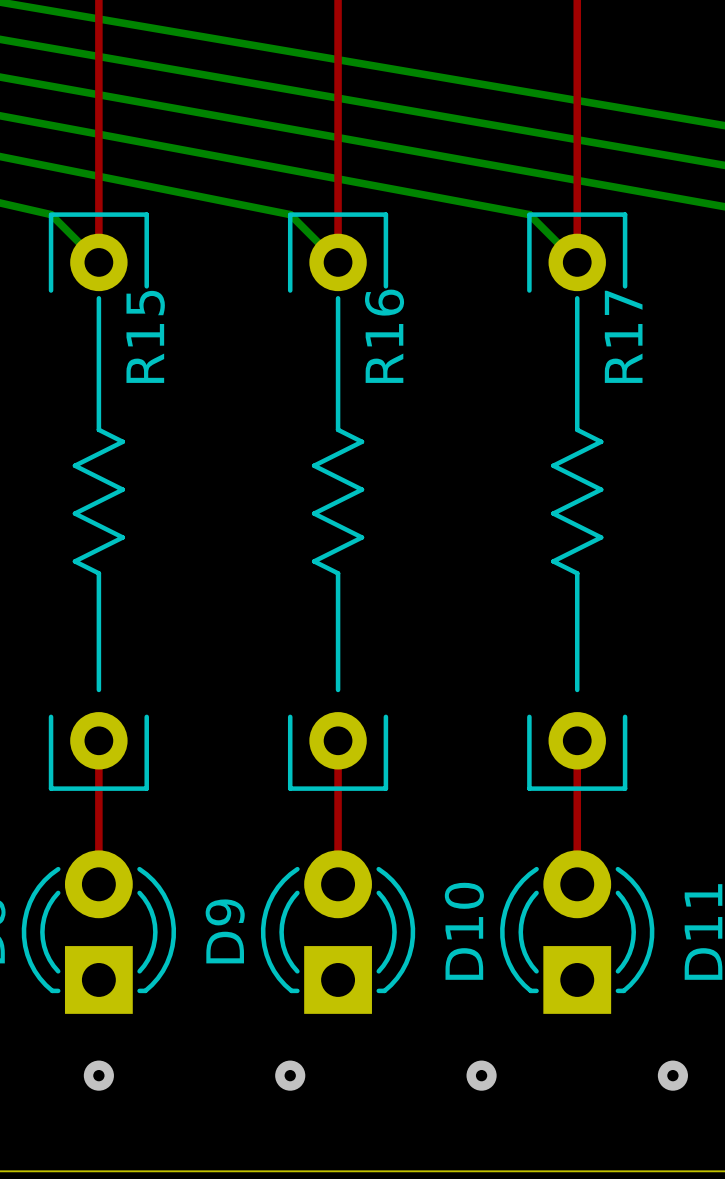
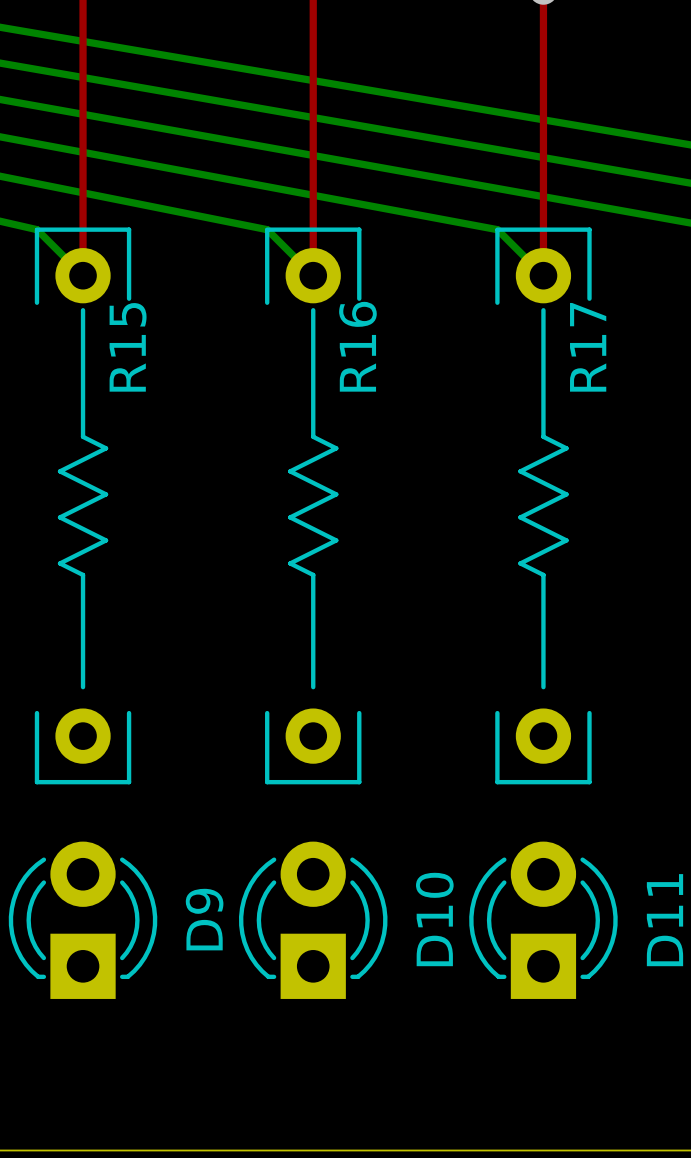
top track: (98, 740) (98, 884) -> none
top track: (338, 740) (338, 884) -> none
top track: (577, 740) (577, 884) -> none
via: (98, 1075) -> none
via: (290, 1075) -> none
via: (481, 1075) -> none
via: (672, 1075) -> none

